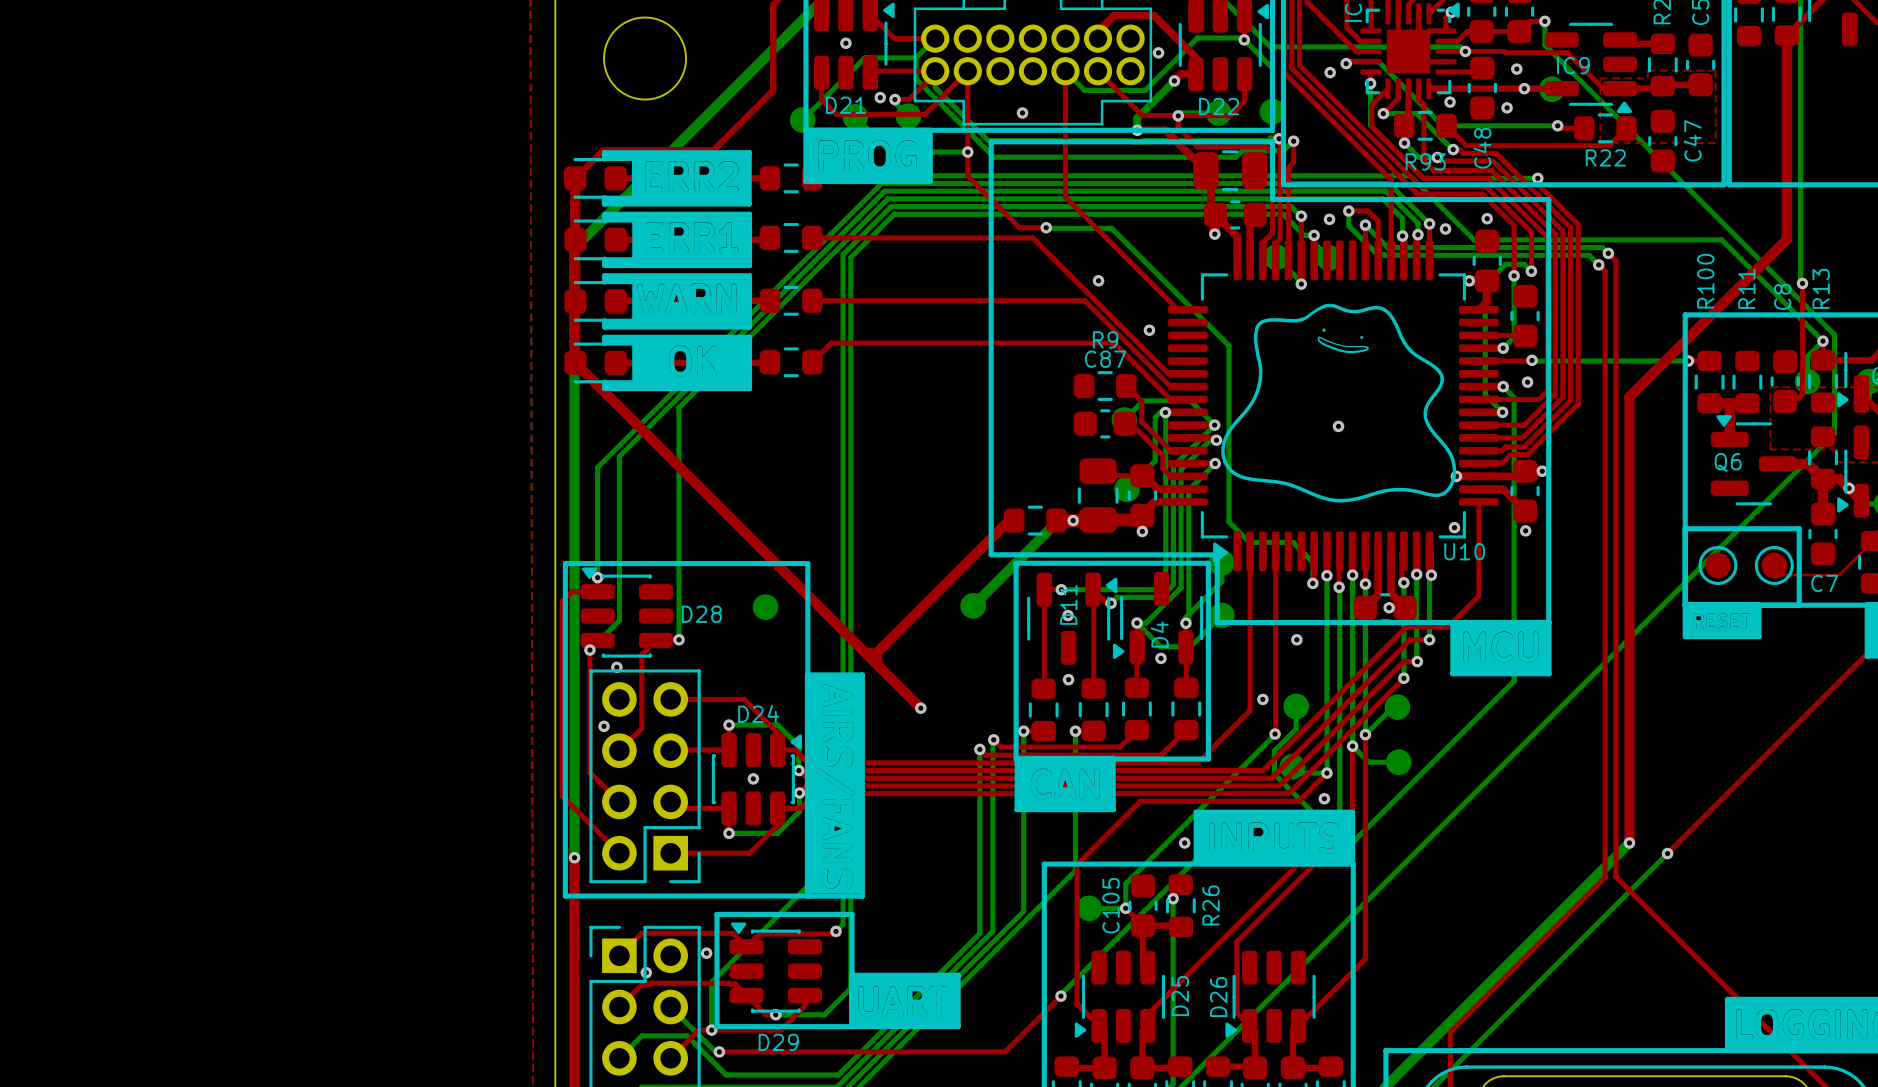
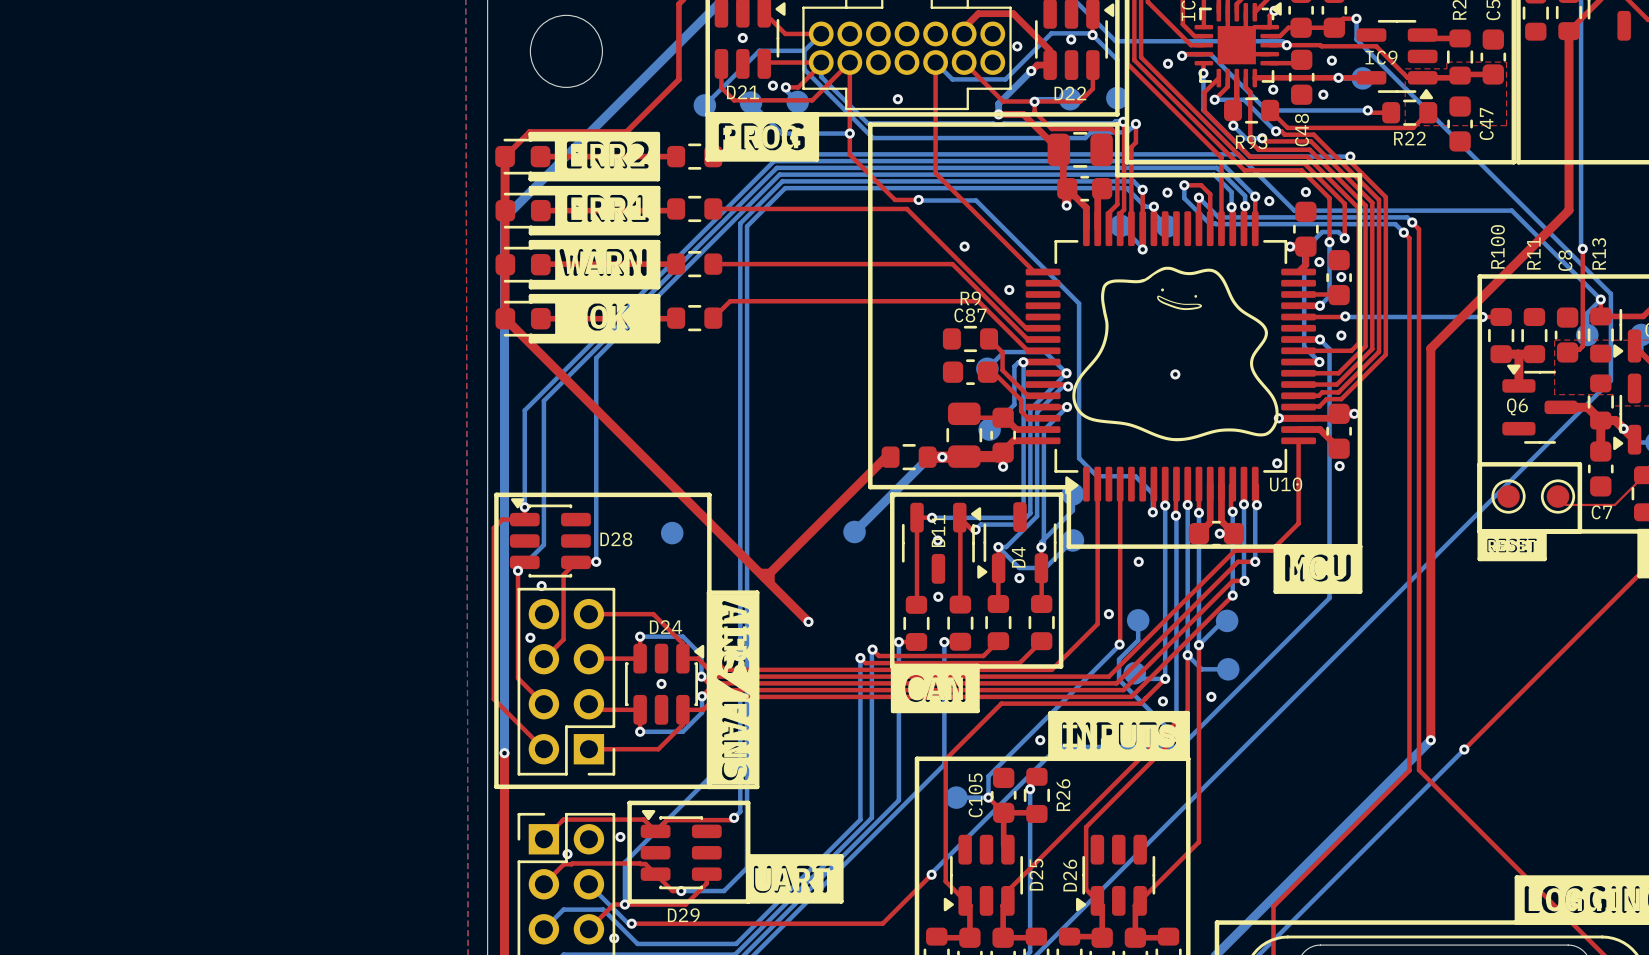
via: none -> (1071, 39)
via: none -> (1319, 262)
via: none -> (1341, 277)
via: none -> (1211, 696)
via: none -> (614, 938)

